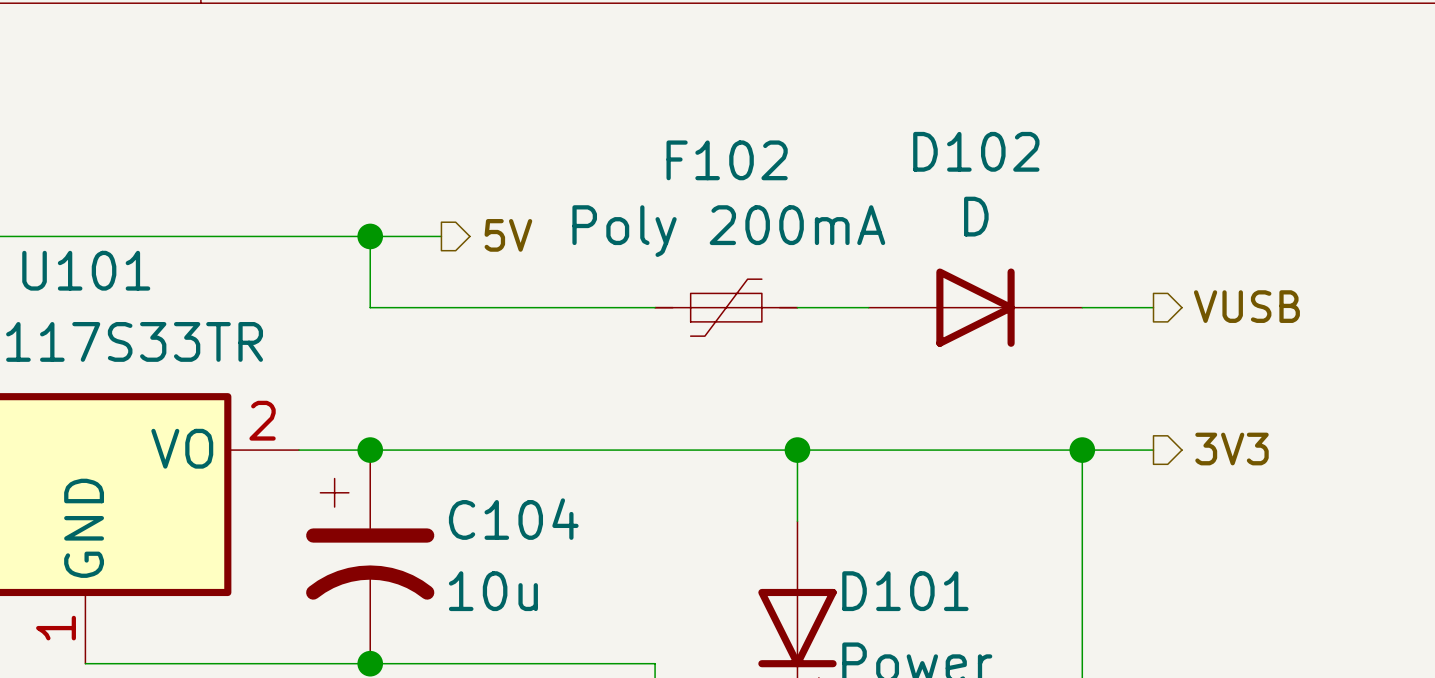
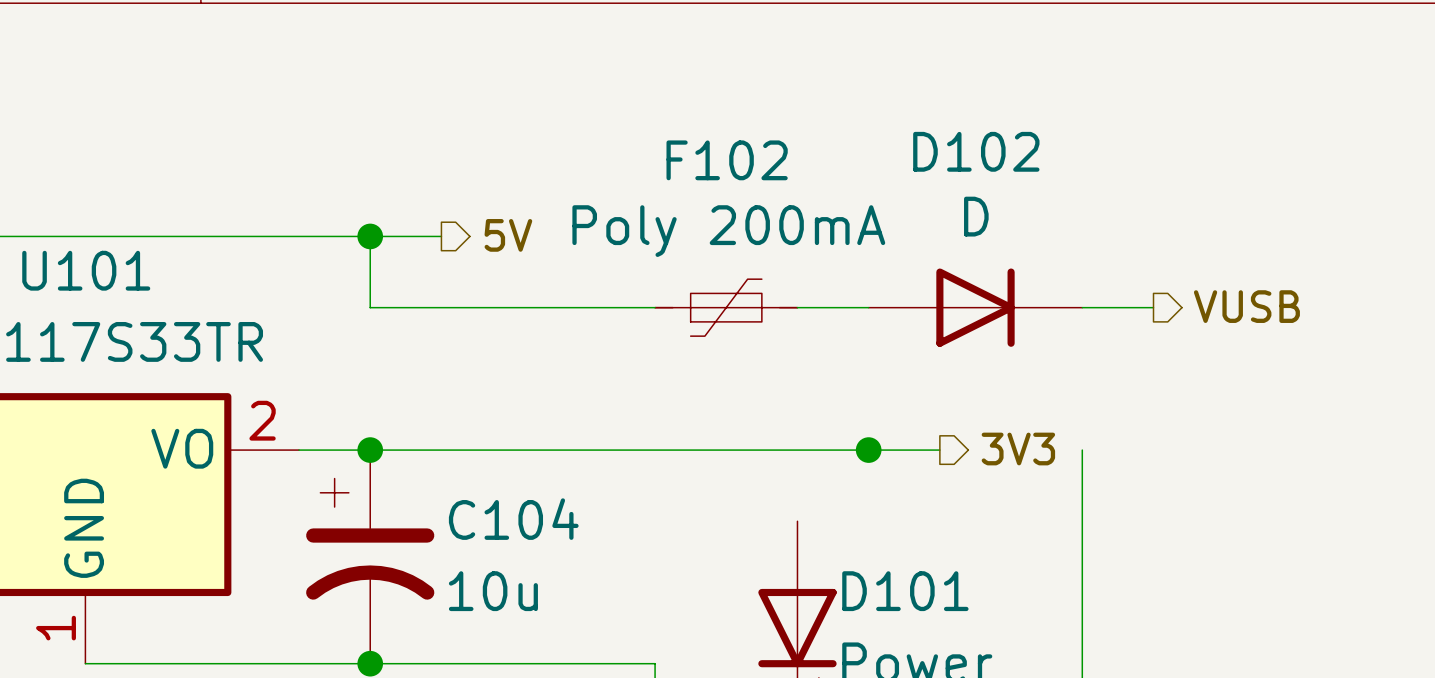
hierarchical label position: 3V3 (1231, 449) -> 3V3 (1018, 449)
wire: (797, 450) (797, 521) -> none
junction position: (797, 450) -> (868, 450)
wire: (939, 450) (1153, 450) -> none
junction: (1082, 450) -> none

